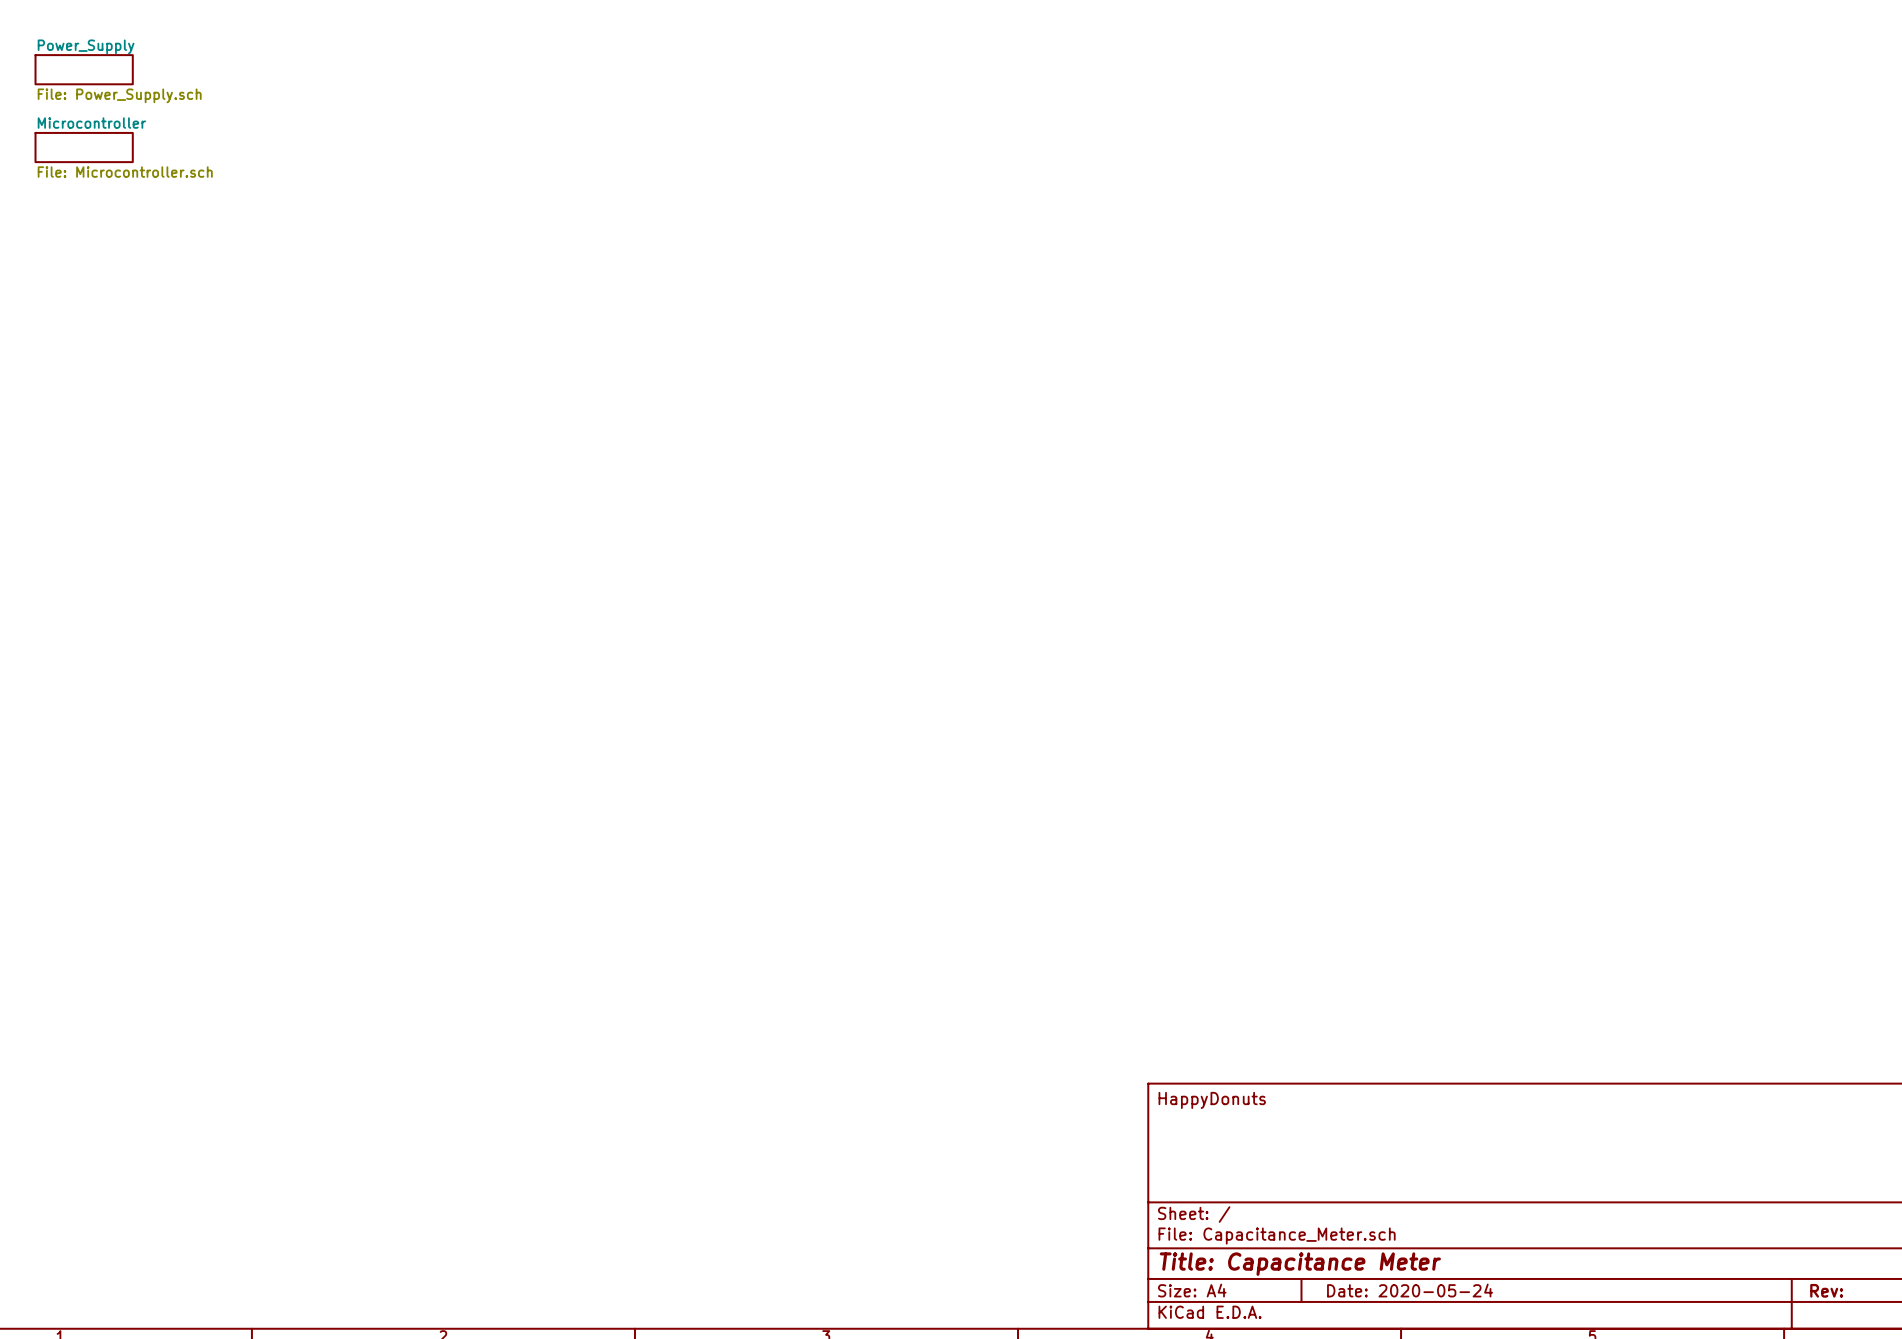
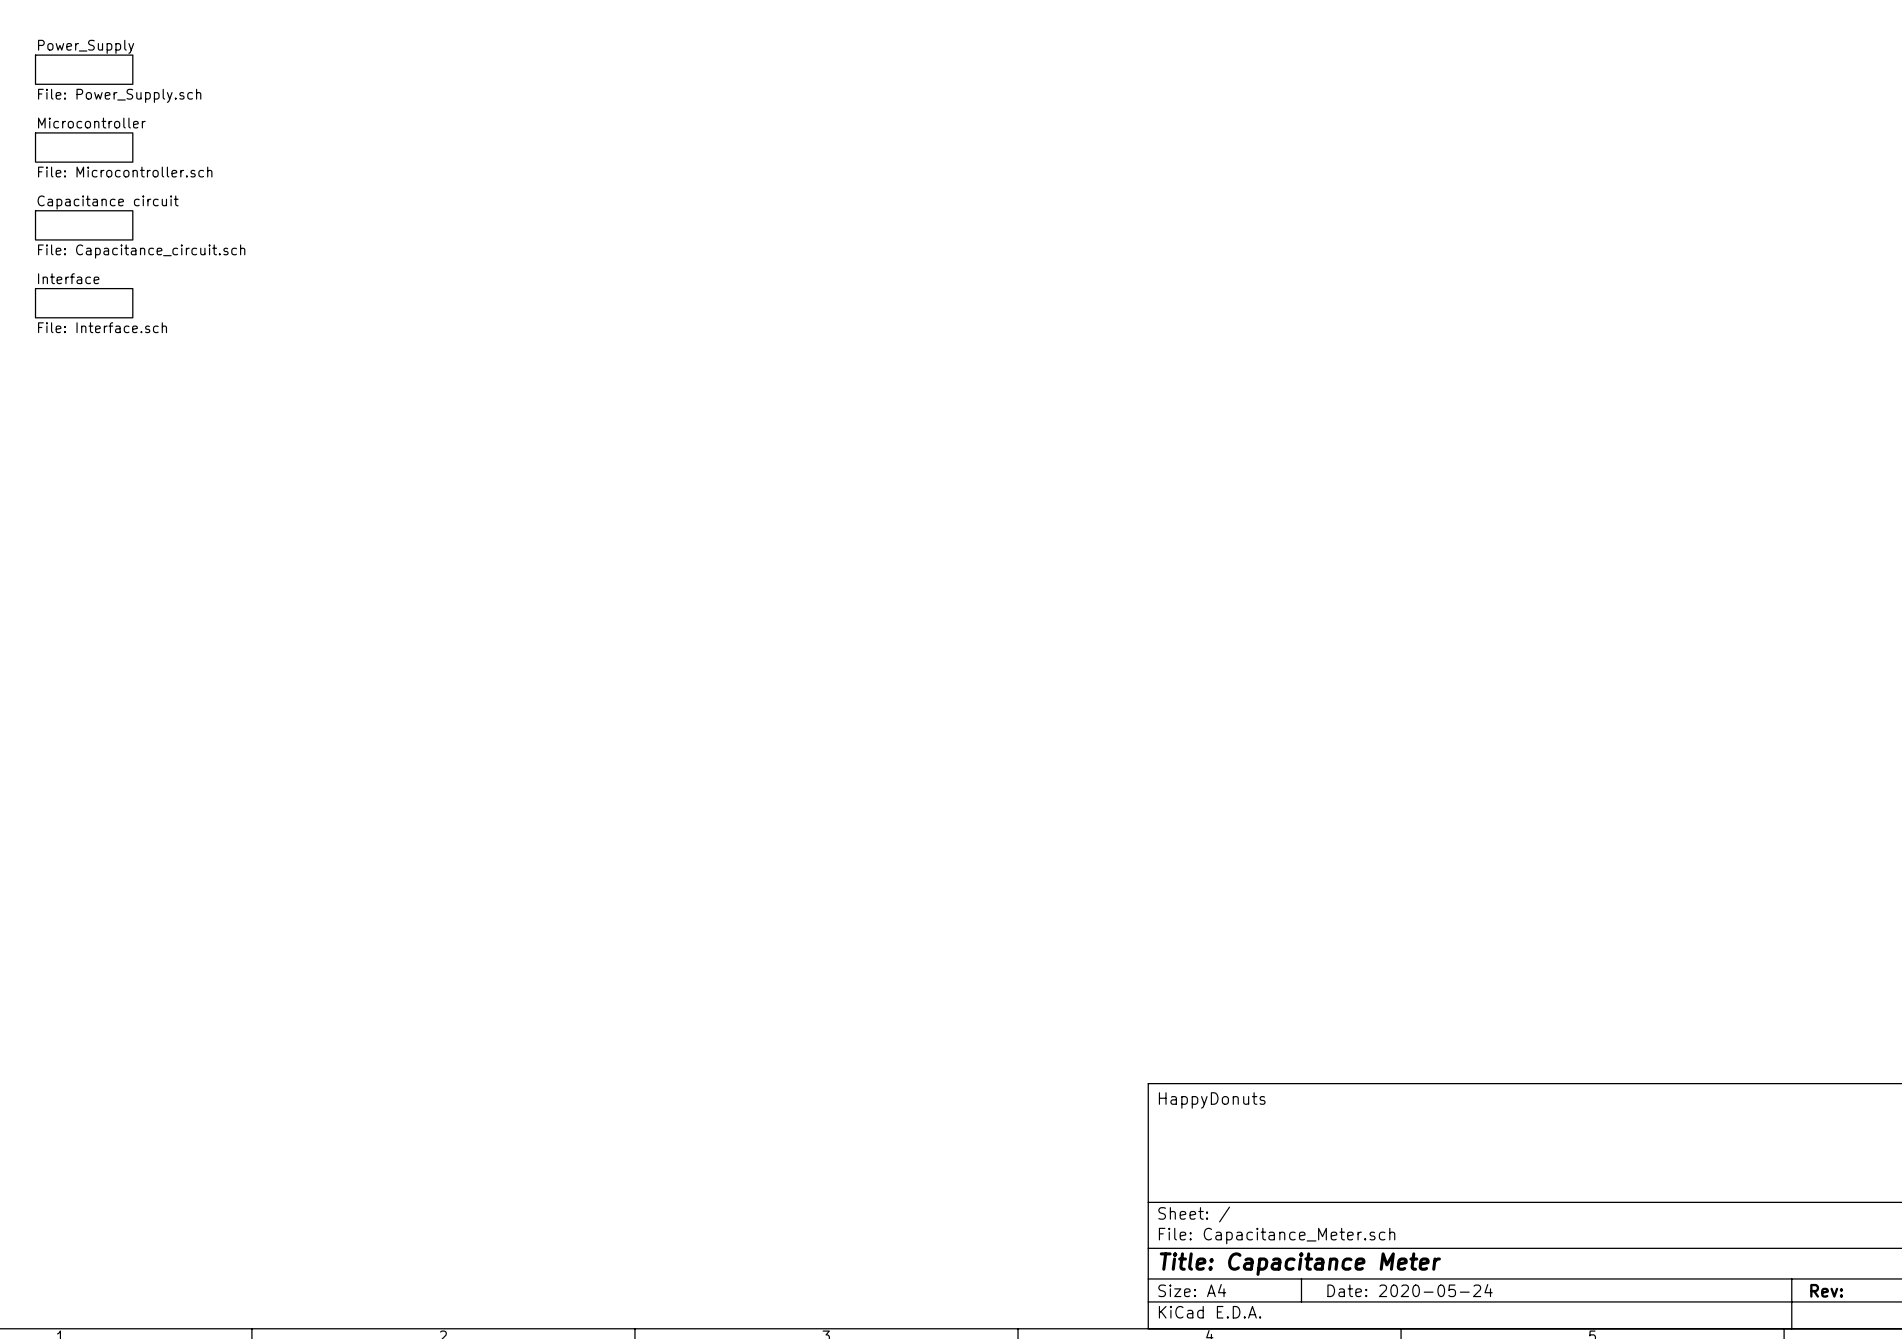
sheet Capacitance circuit: none -> File: Capacitance_circuit.sch (84, 225)
sheet Interface: none -> File: Interface.sch (84, 303)

